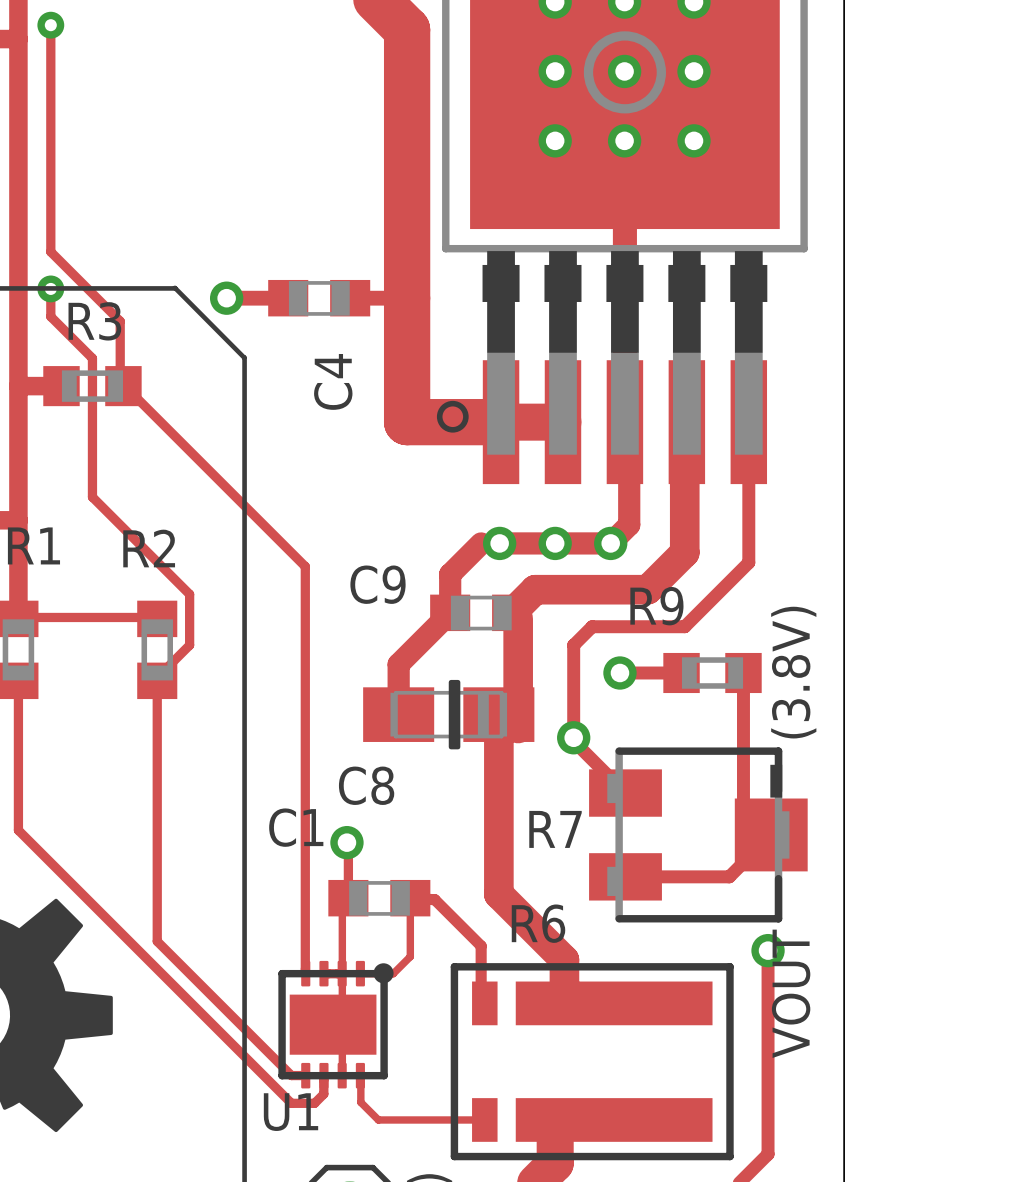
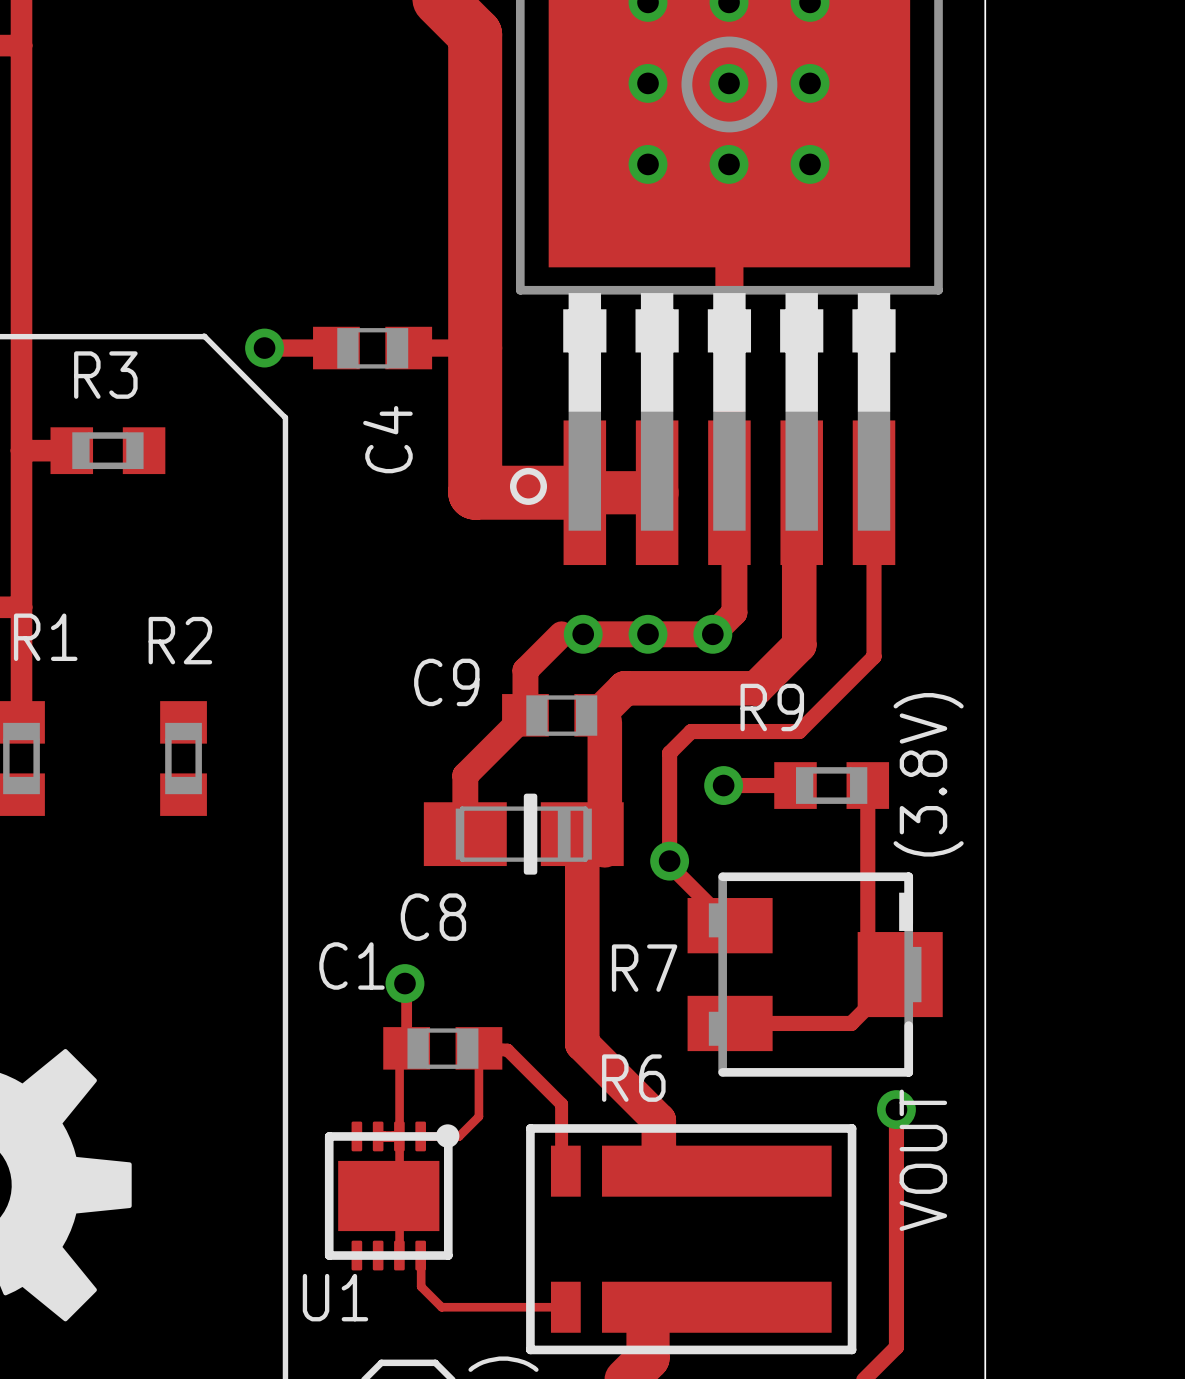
track: (50, 25) (50, 251) (120, 321) (120, 386) (124, 386) (305, 566) (305, 973) -> none
via: (50, 25) -> none
track: (50, 288) (50, 316) (92, 358) (92, 497) (189, 594) (189, 645) (157, 677) (157, 941) (291, 1075) (305, 1075) -> none
via: (50, 288) -> none
track: (18, 618) (157, 618) -> none
track: (18, 680) (18, 830) (291, 1103) (314, 1103) (323, 1094) (323, 1075) -> none

